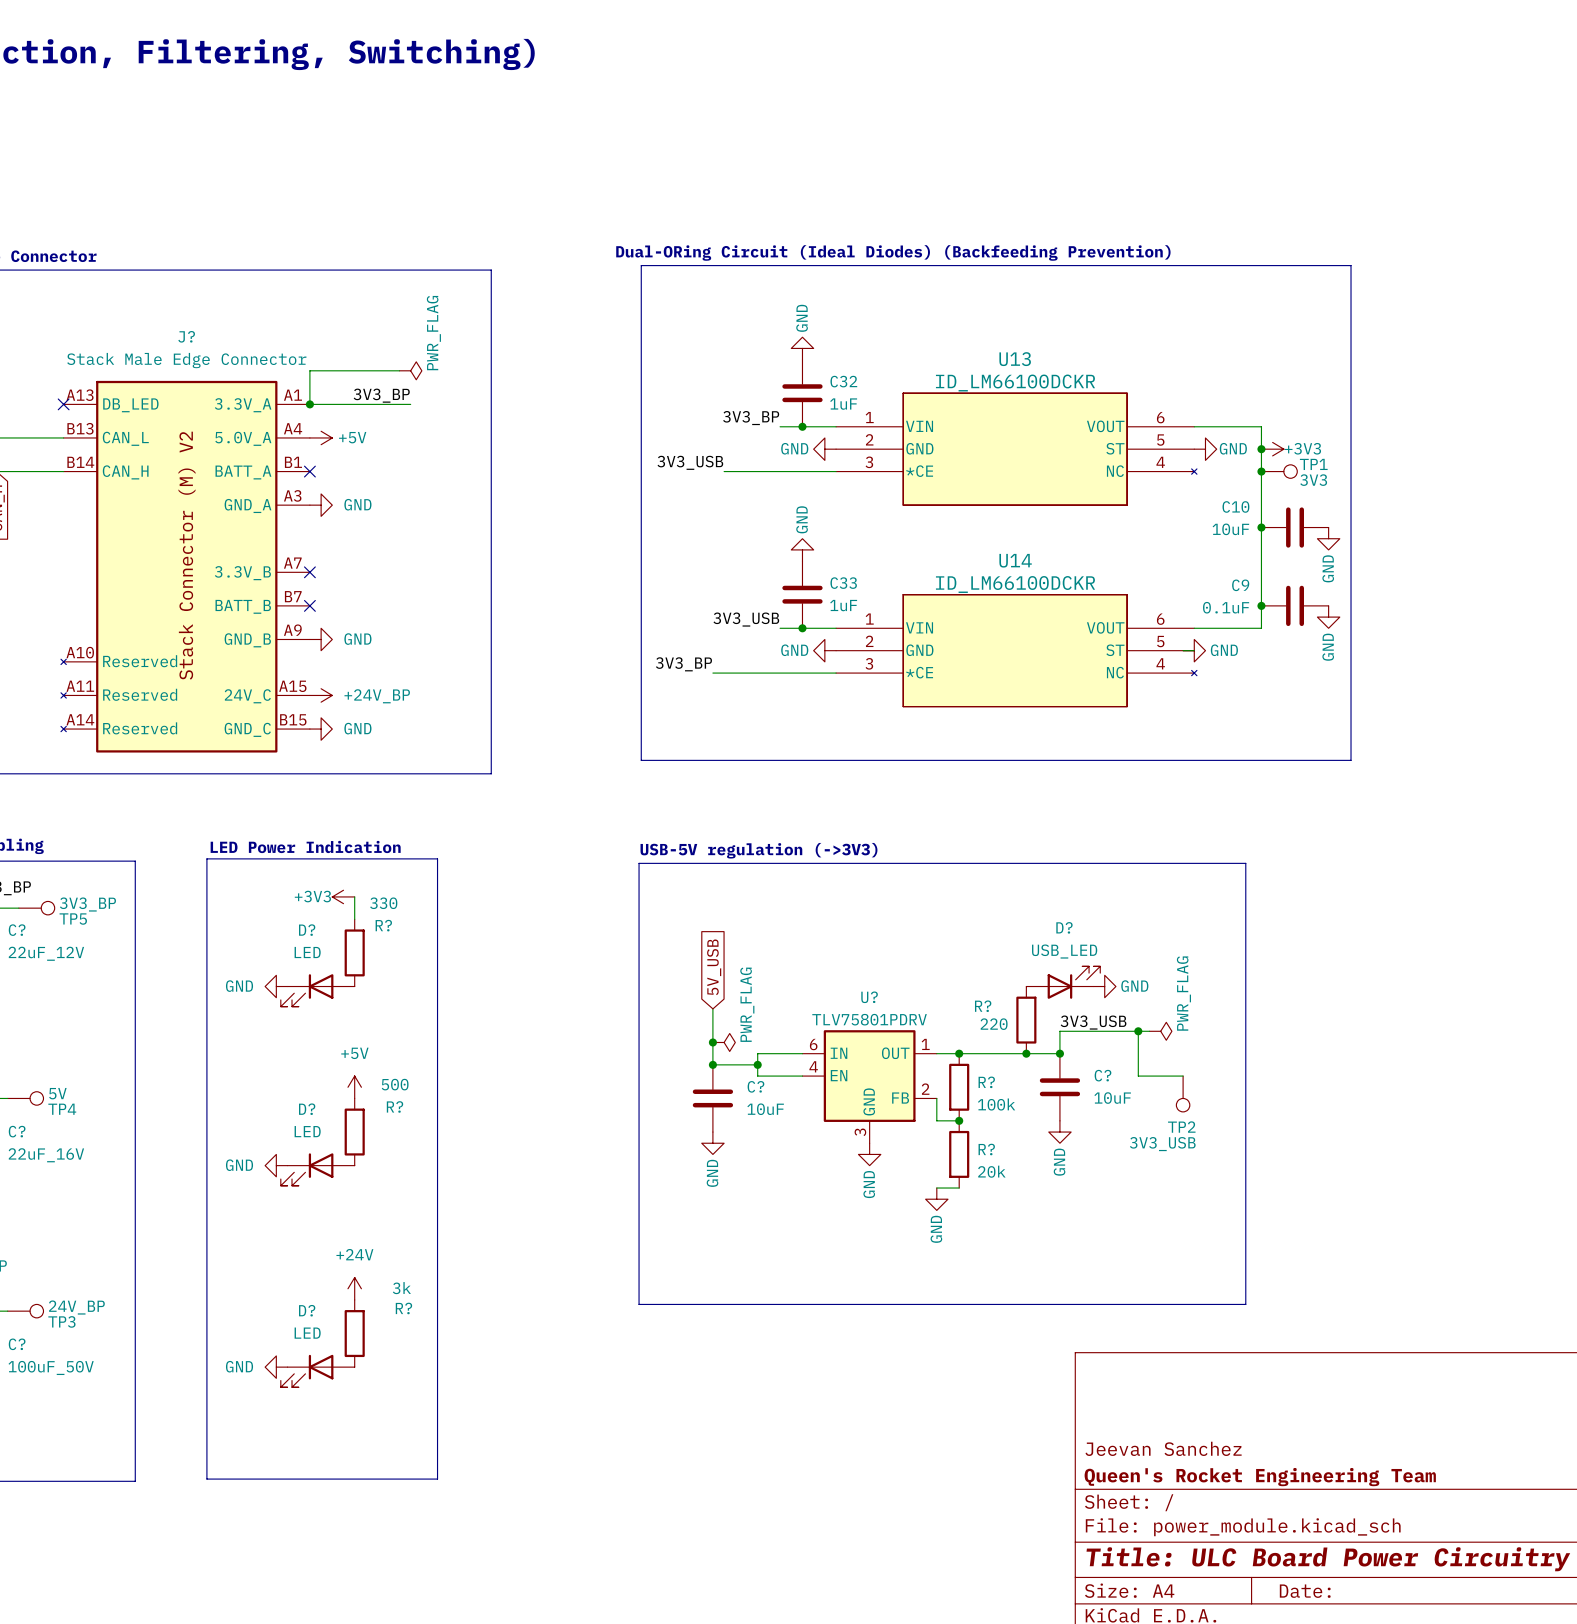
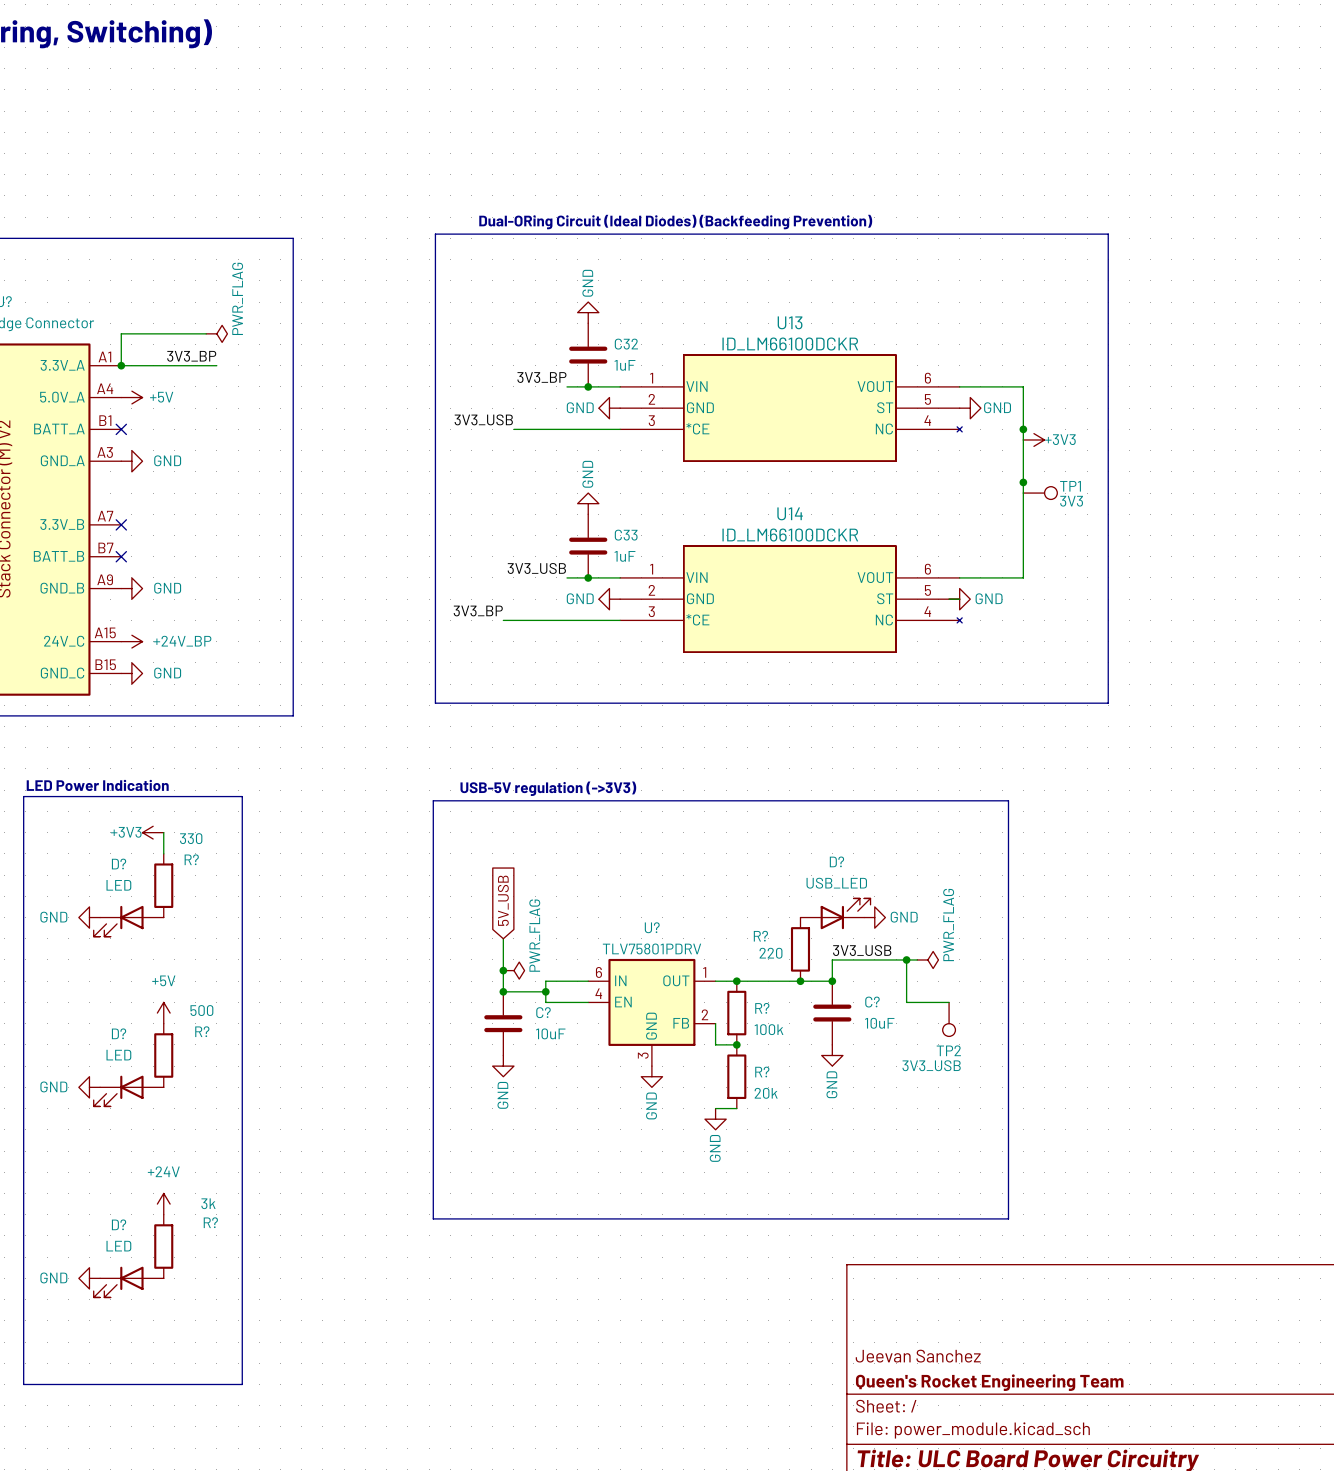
junction: (1261, 449) -> none
power symbol position: +3V3 (1272, 449) -> +3V3 (1033, 439)
TP1 position: (1279, 471) -> (1040, 493)
C10: 10uF (1295, 527) -> none
power symbol: GND (1328, 538) -> none
junction: (1261, 605) -> none
C9: 0.1uF (1295, 605) -> none
power symbol: GND (1328, 617) -> none

